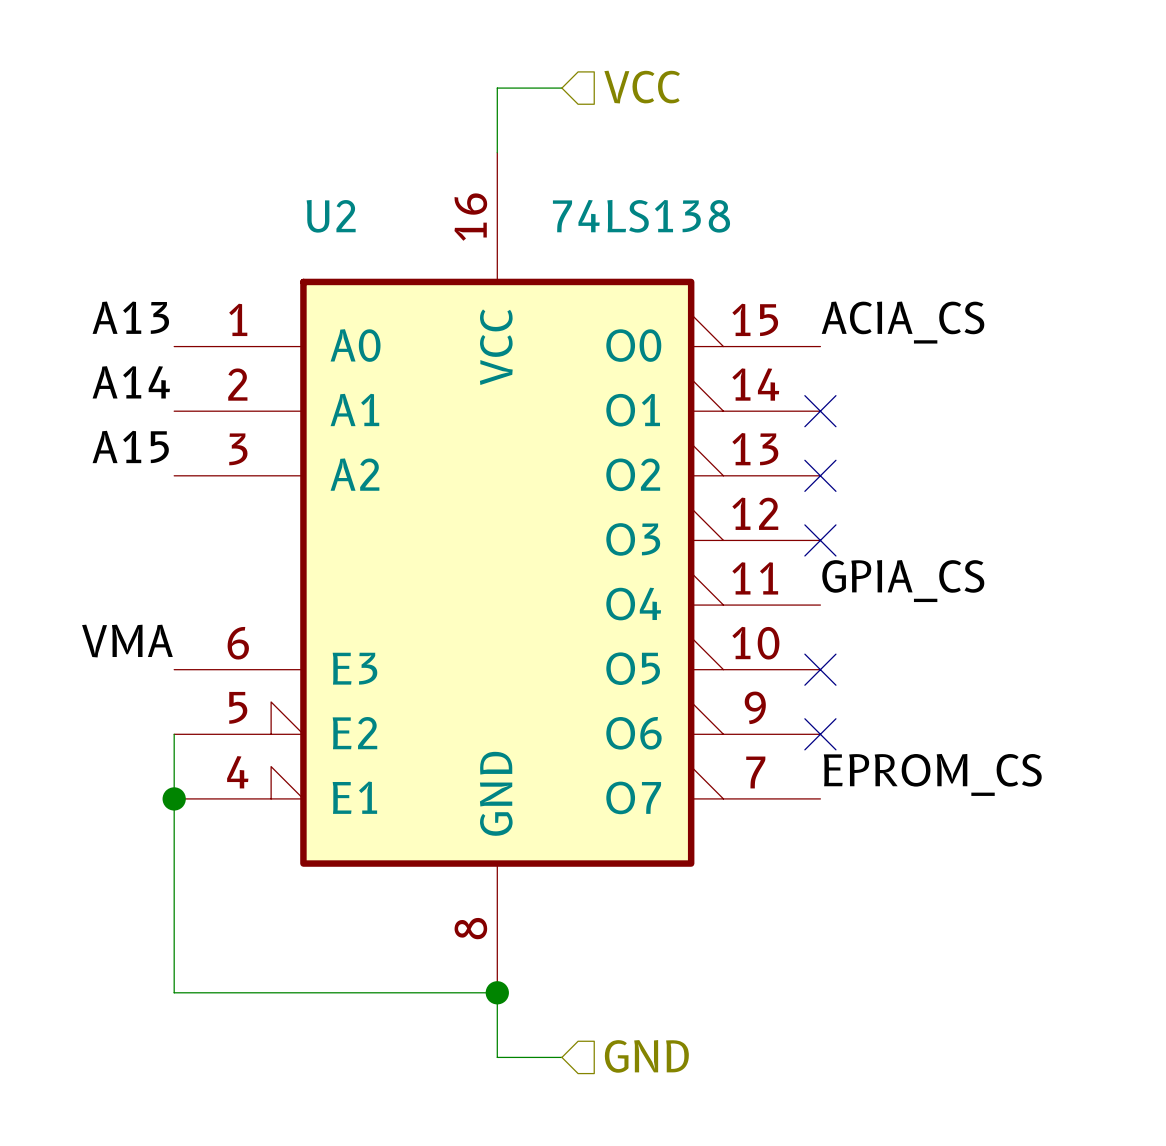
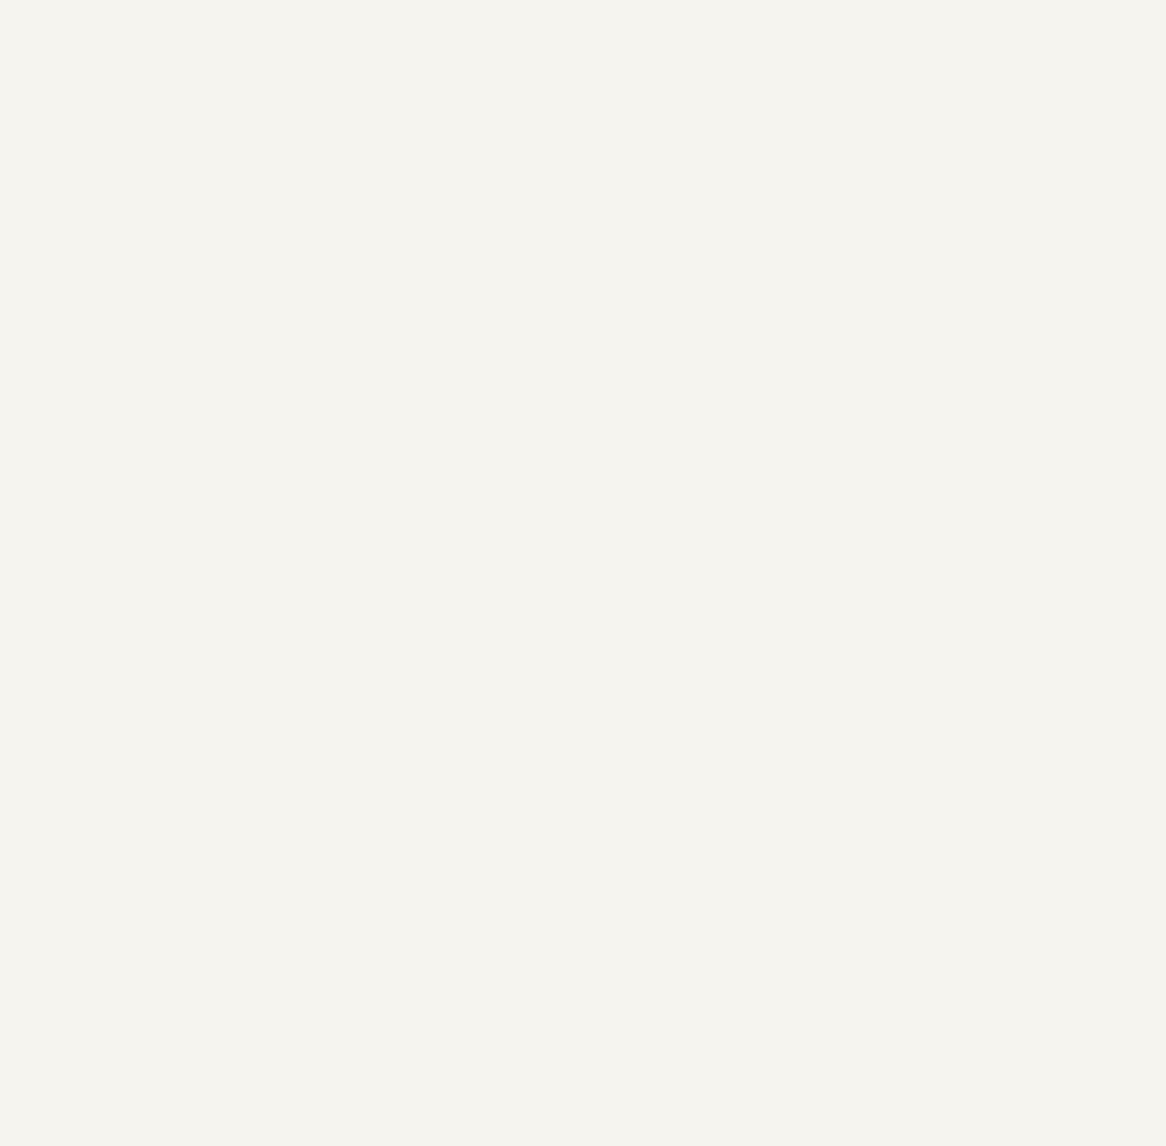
hierarchical label: VCC (642, 87) -> none
wire: (561, 88) (497, 88) (497, 152) -> none
label: A13 (130, 317) -> none
label: ACIA_CS (903, 322) -> none
label: A14 (131, 382) -> none
no-connect mark: (820, 411) -> none
label: A15 (130, 446) -> none
no-connect mark: (820, 475) -> none
no-connect mark: (820, 540) -> none
U2: 74LS138 (497, 572) -> none
label: GPIA_CS (903, 581) -> none
label: VMA (127, 641) -> none
no-connect mark: (820, 669) -> none
wire: (174, 734) (174, 992) (497, 992) (497, 1057) (561, 1057) -> none
no-connect mark: (820, 734) -> none
label: EPROM_CS (932, 774) -> none
junction: (174, 798) -> none
junction: (497, 992) -> none
hierarchical label: GND (646, 1056) -> none

